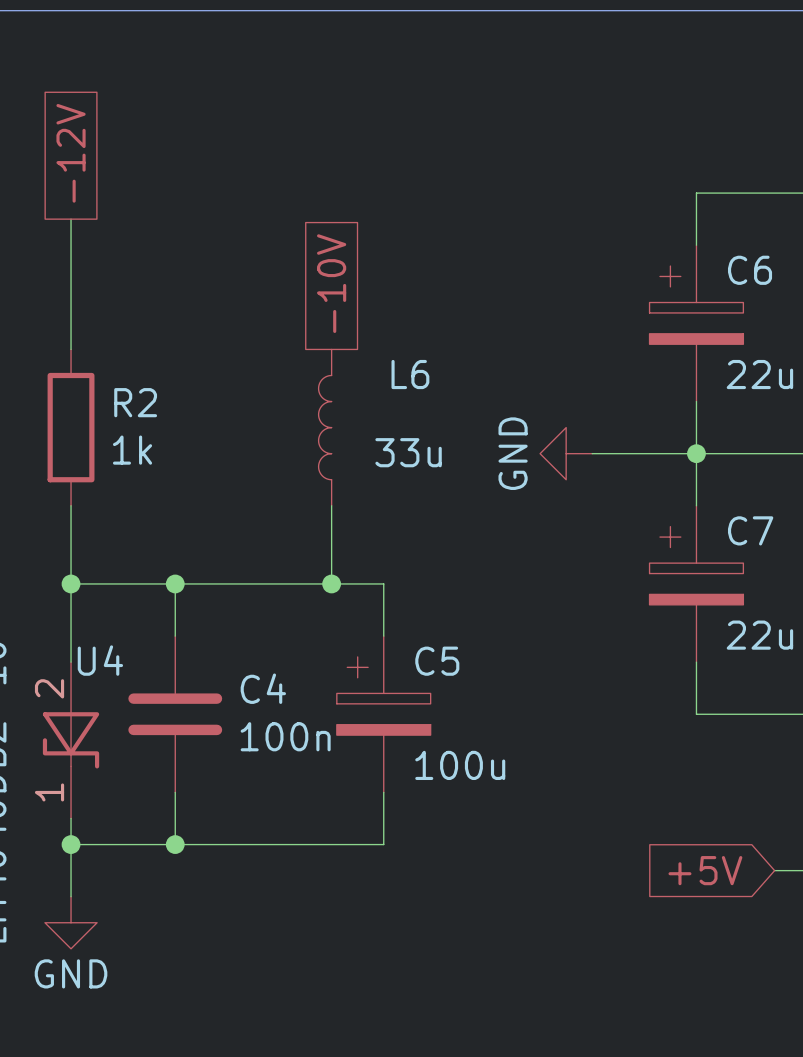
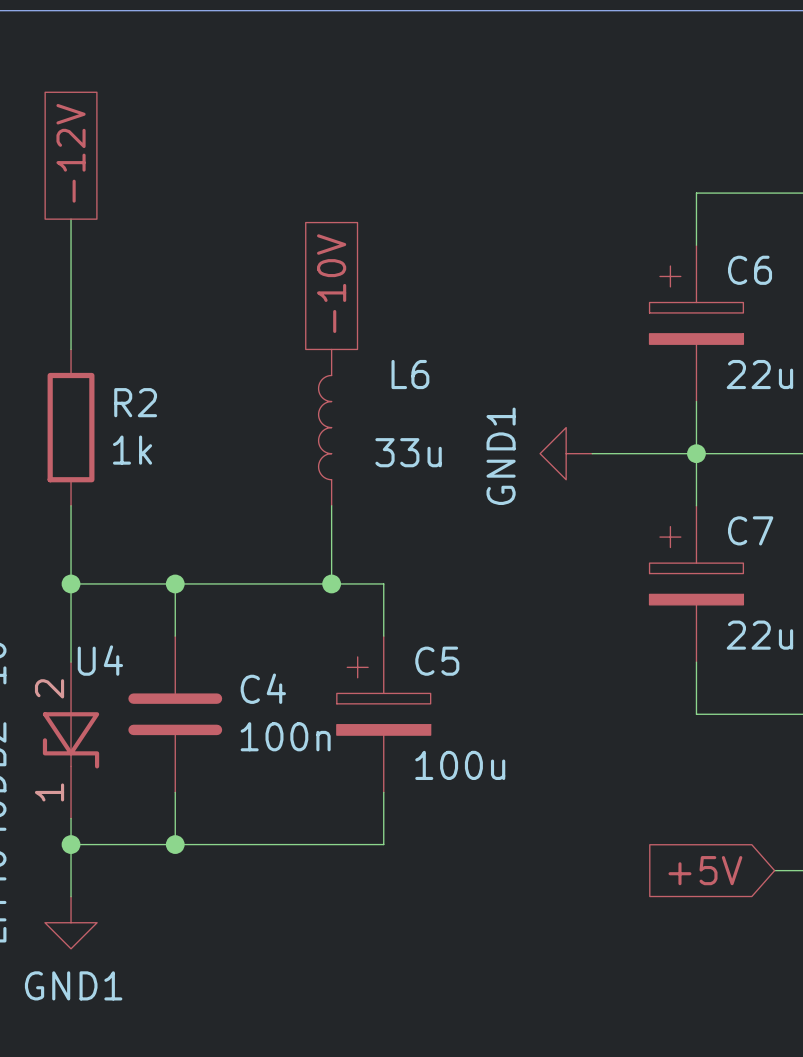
power symbol: GND (566, 453) -> GND1 (566, 453)
power symbol: GND (71, 922) -> GND1 (71, 922)

